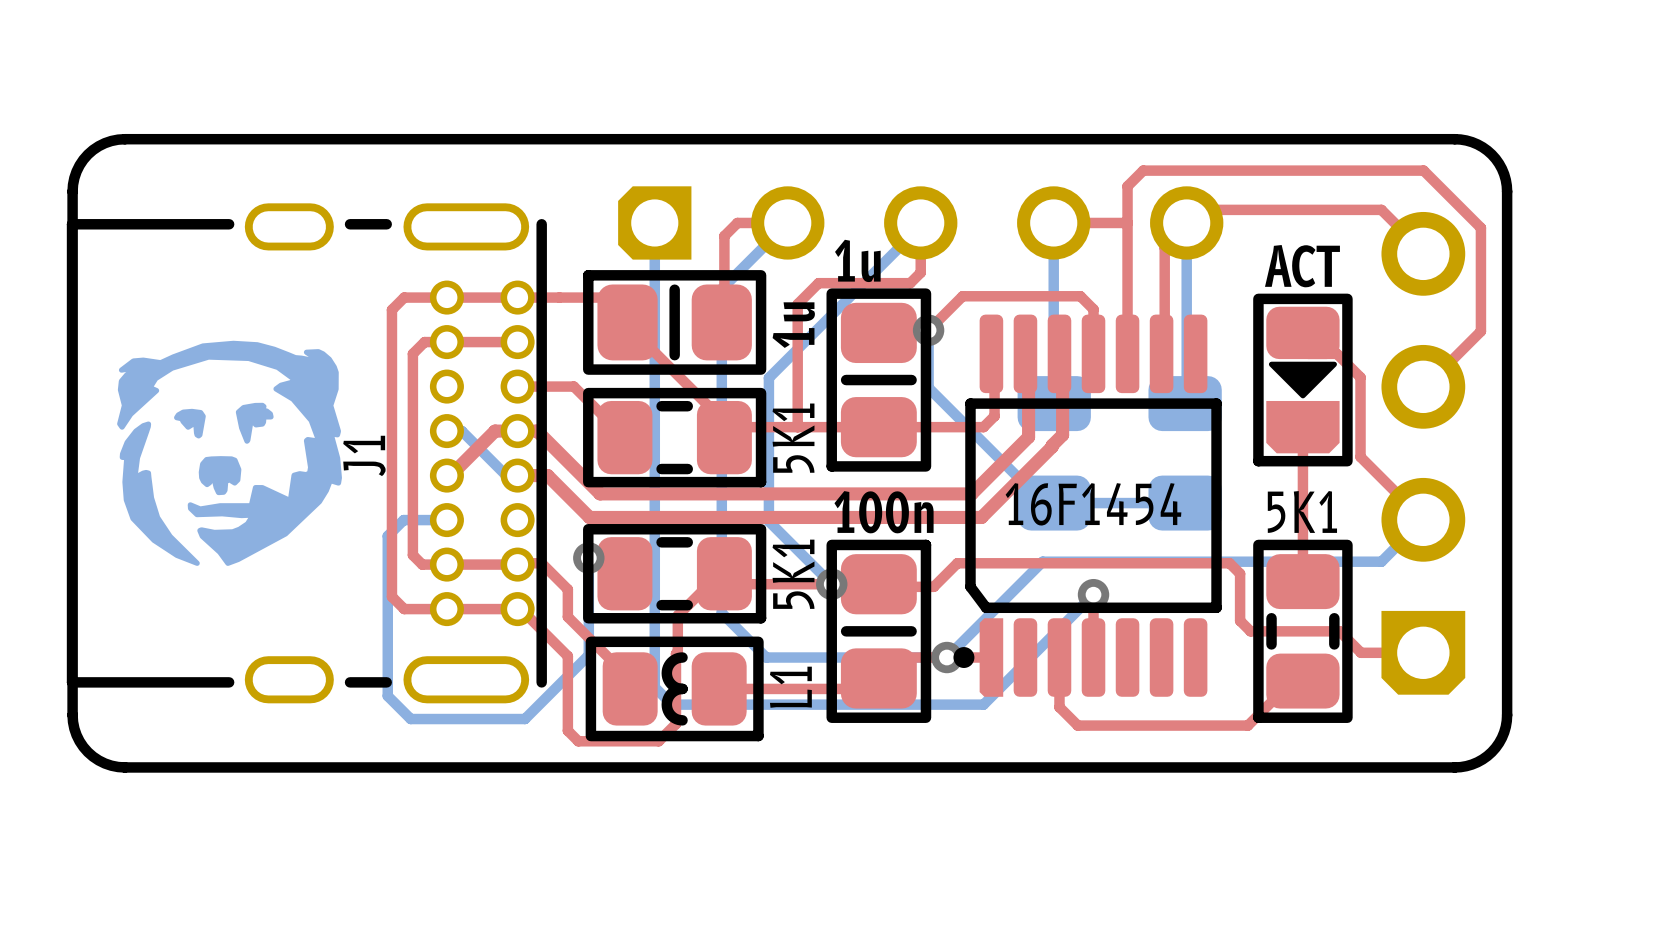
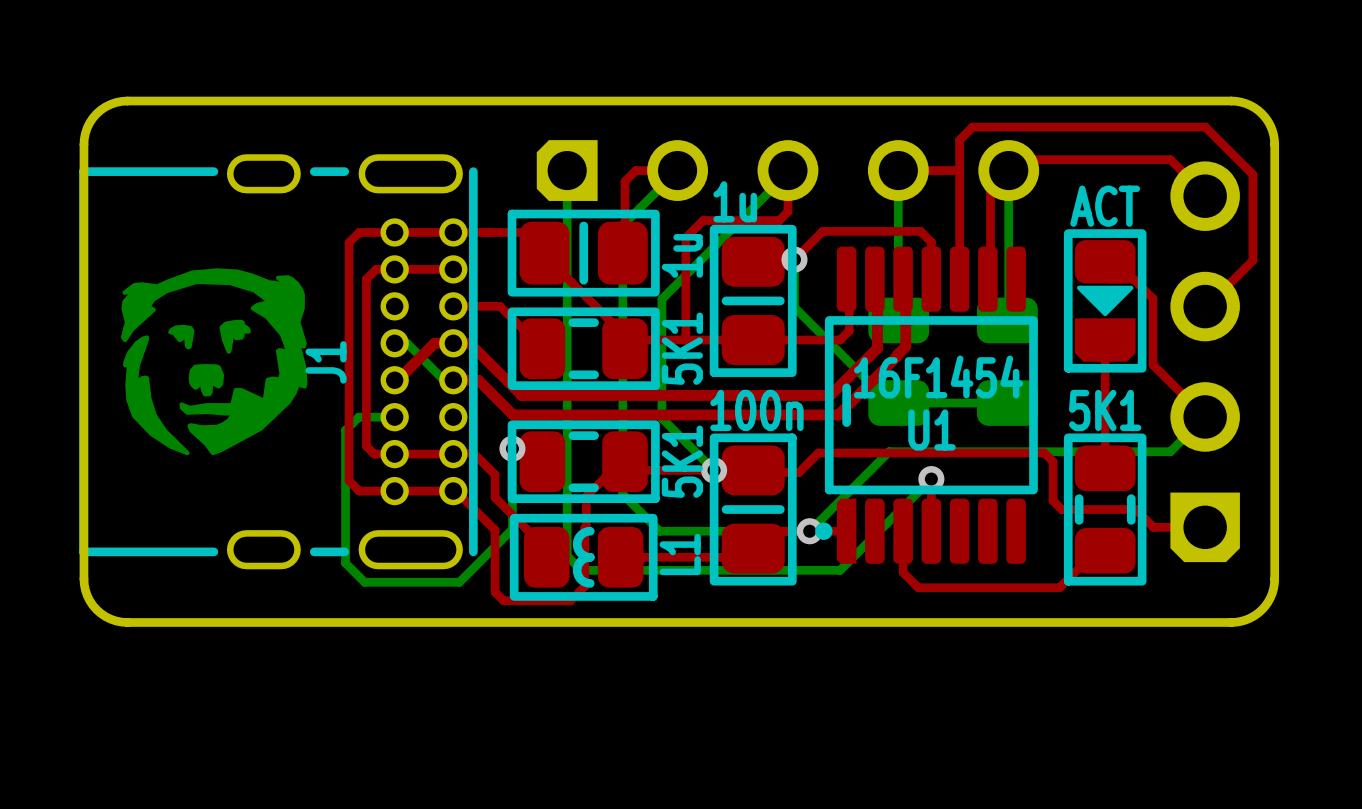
part: 16F1454 (1087, 505) -> none
U1: none -> 16F1454 (926, 405)

